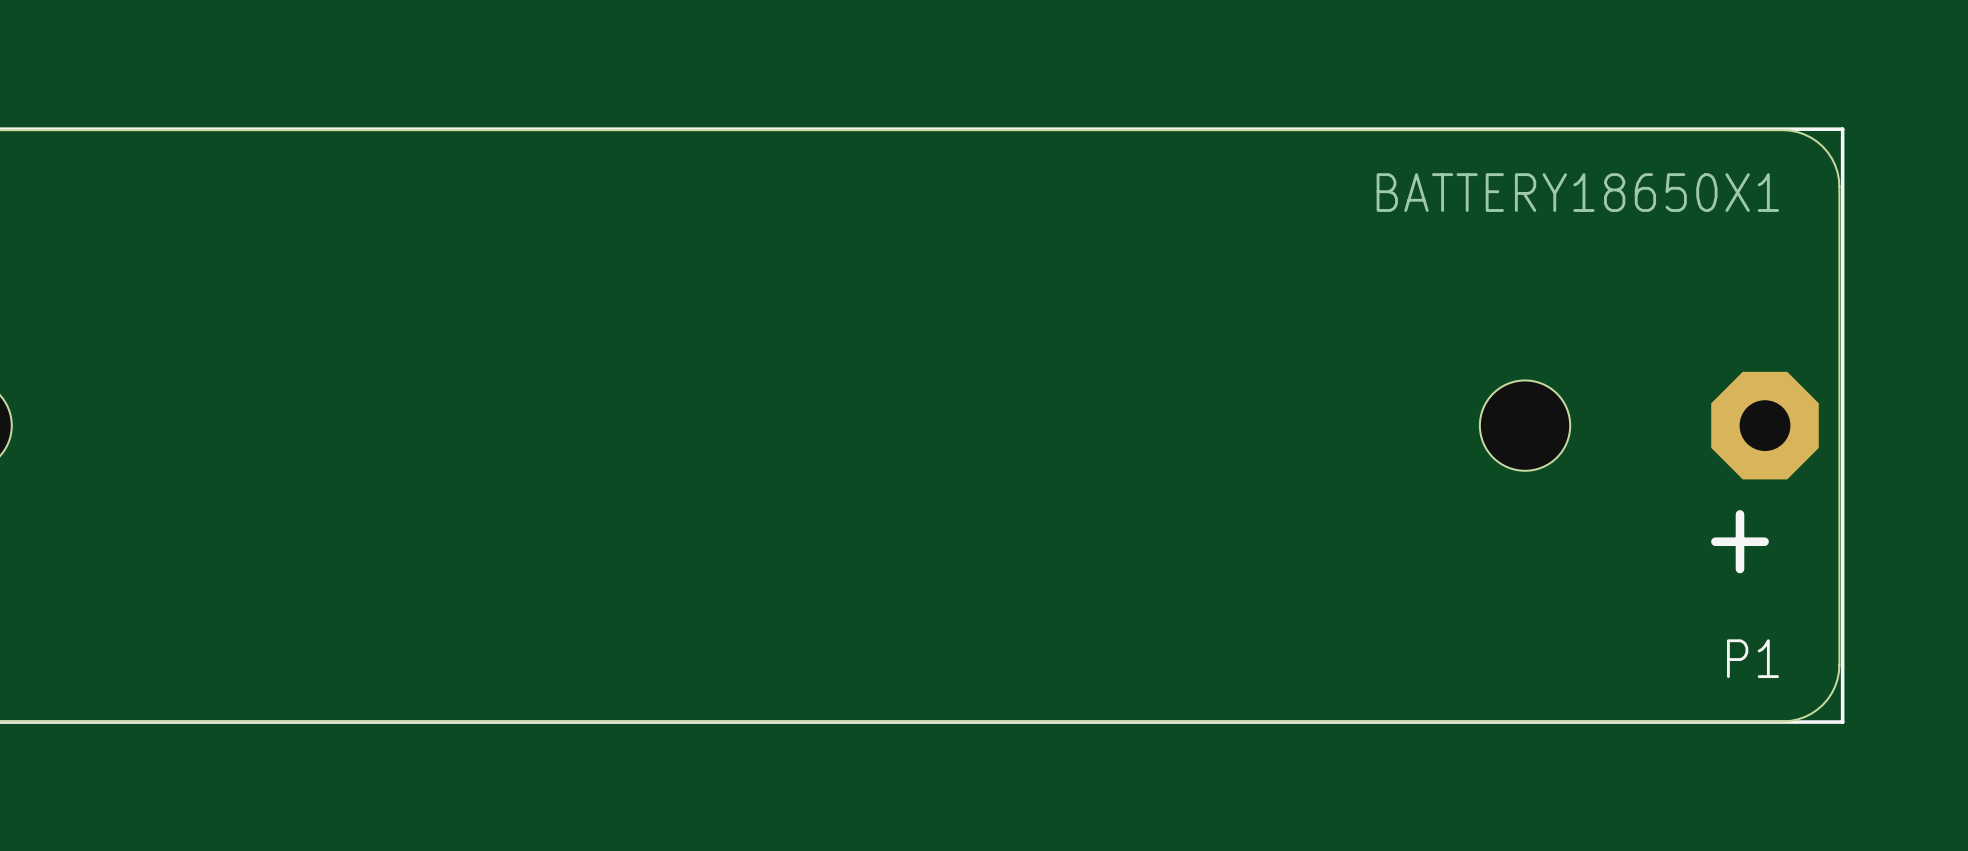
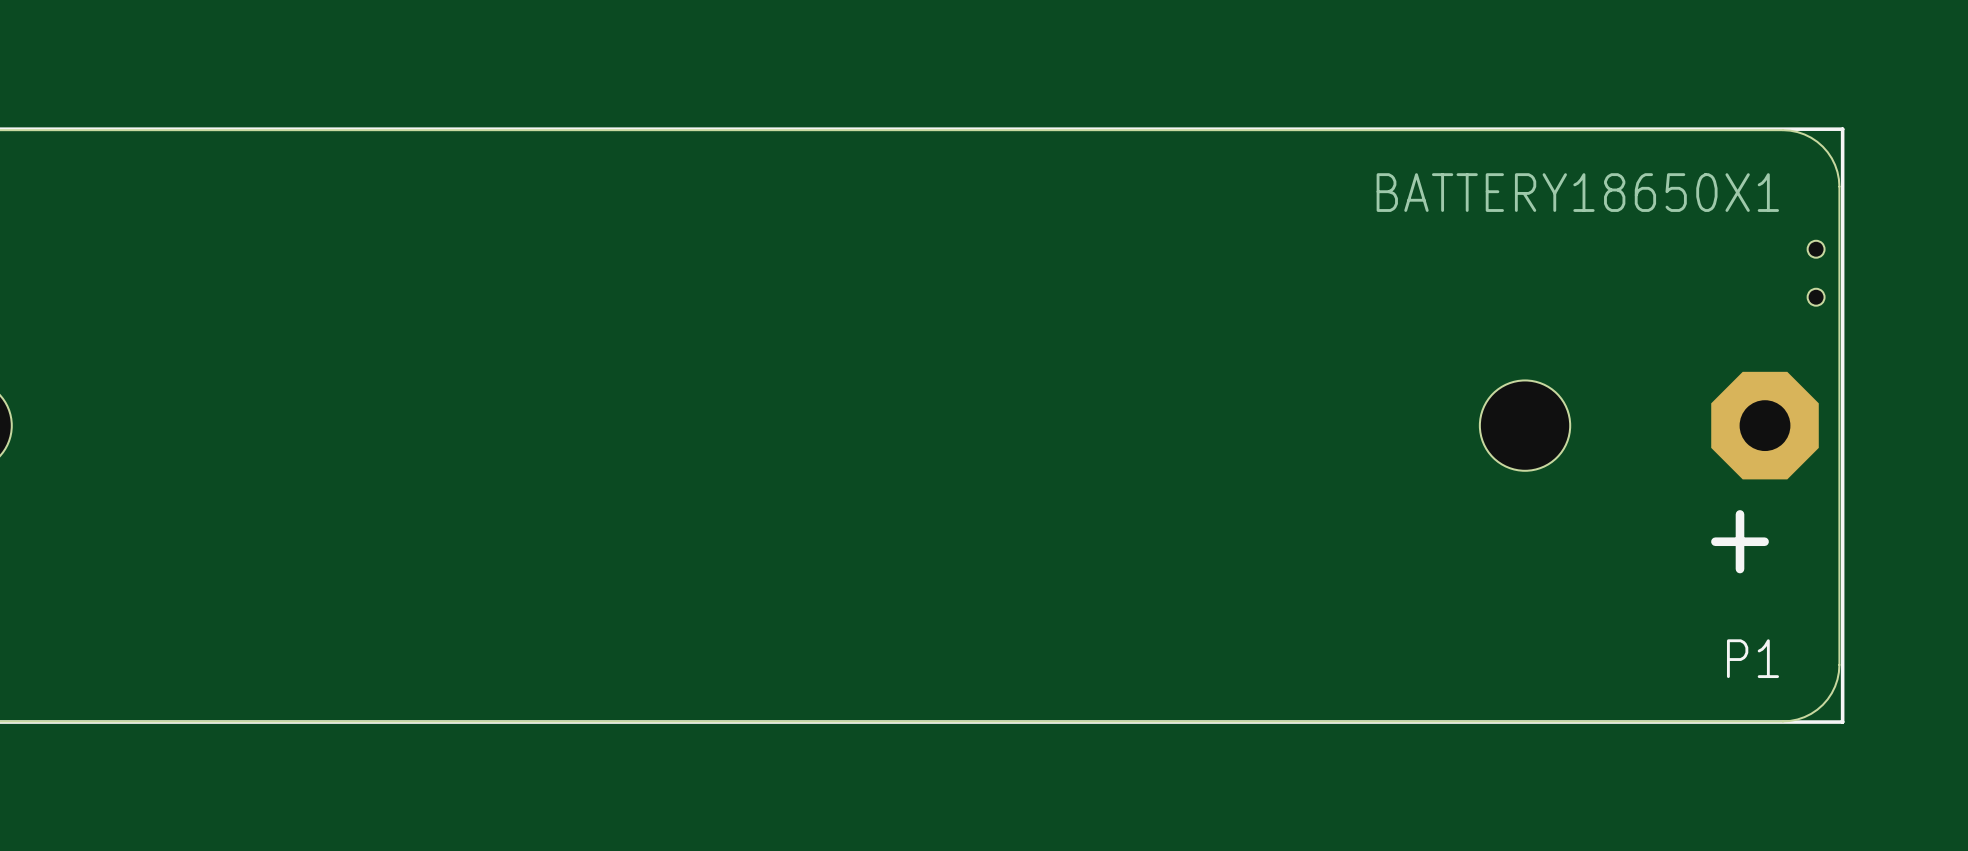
part: none -> (1816, 273)

